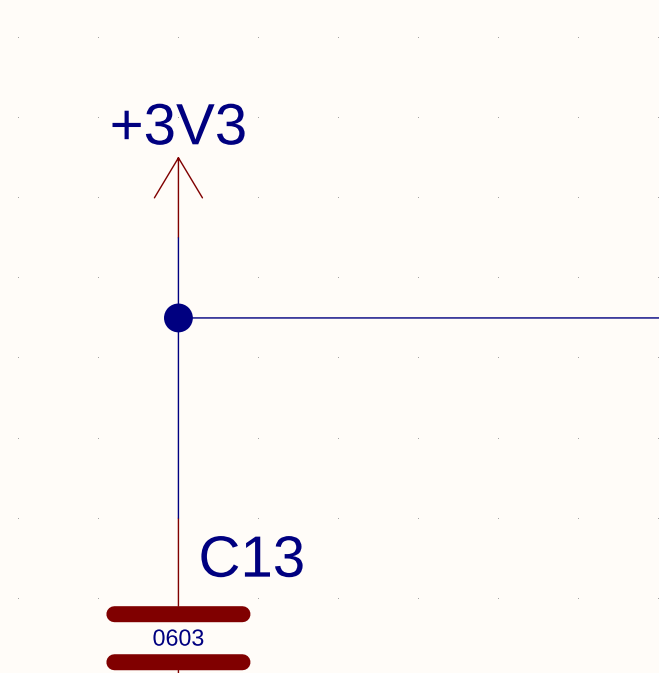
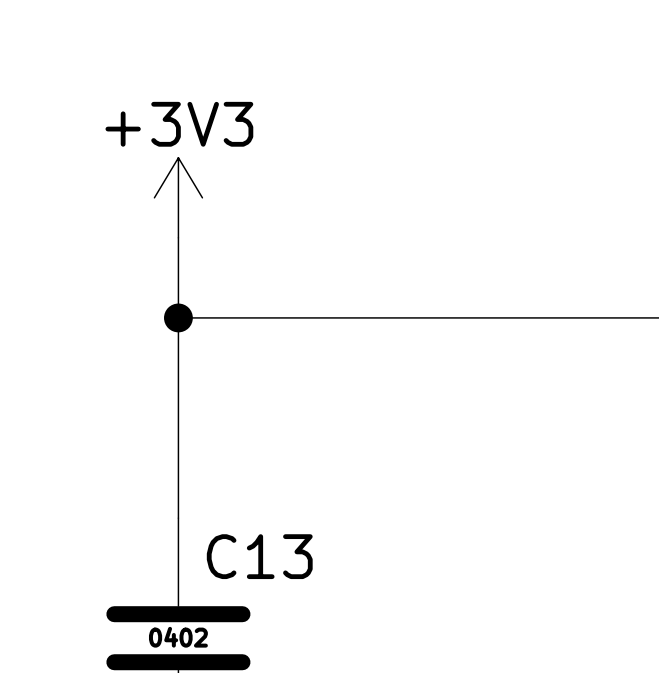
C13 text: 0603 (178, 637) -> 0402 (178, 637)

